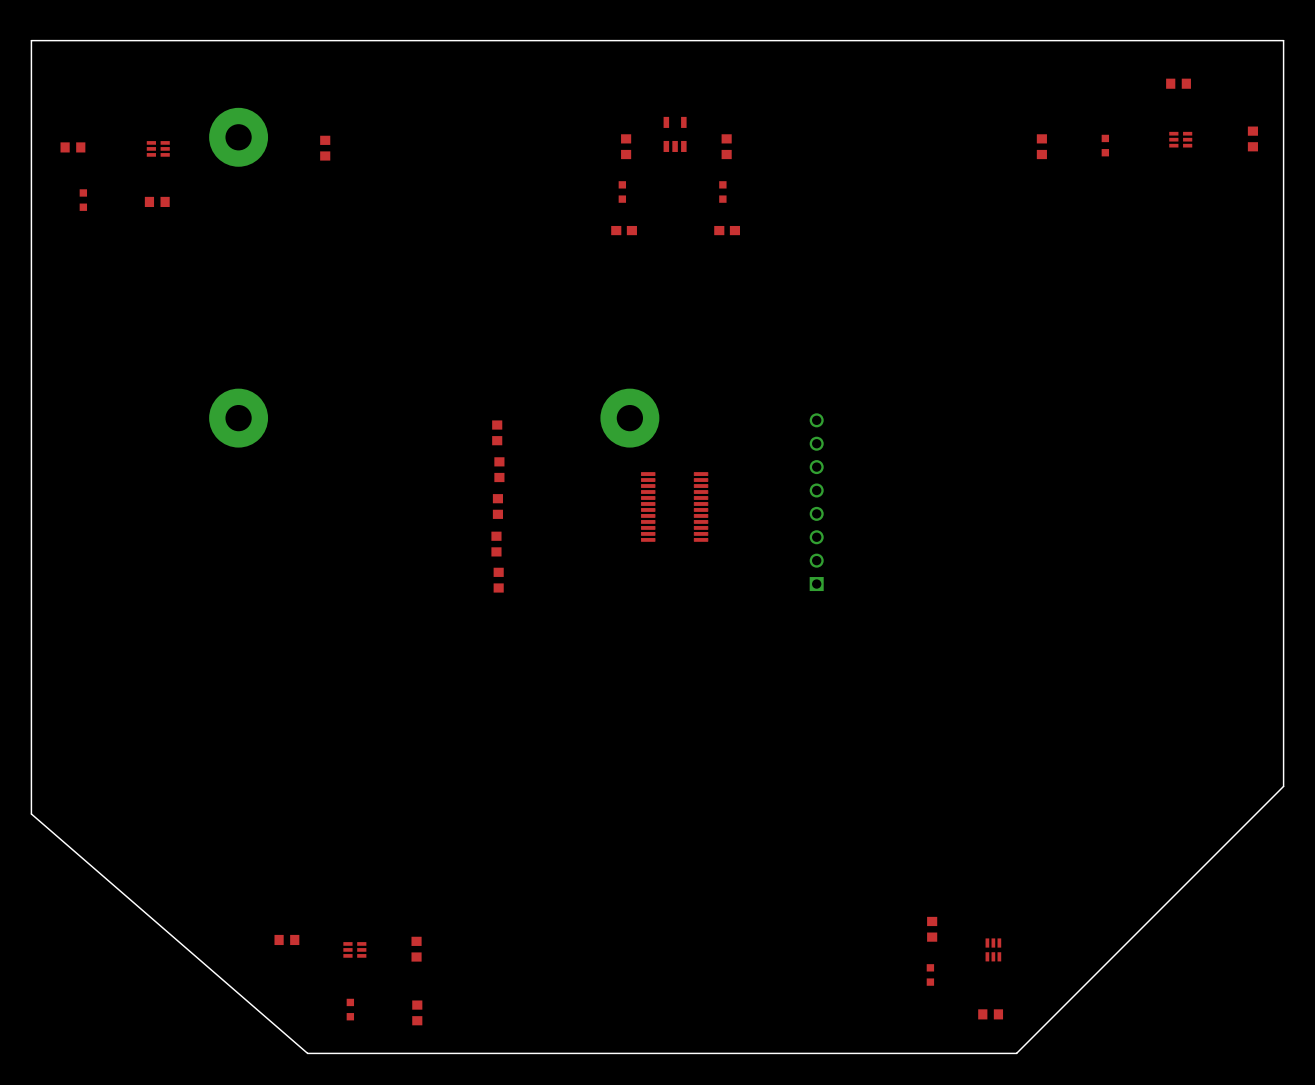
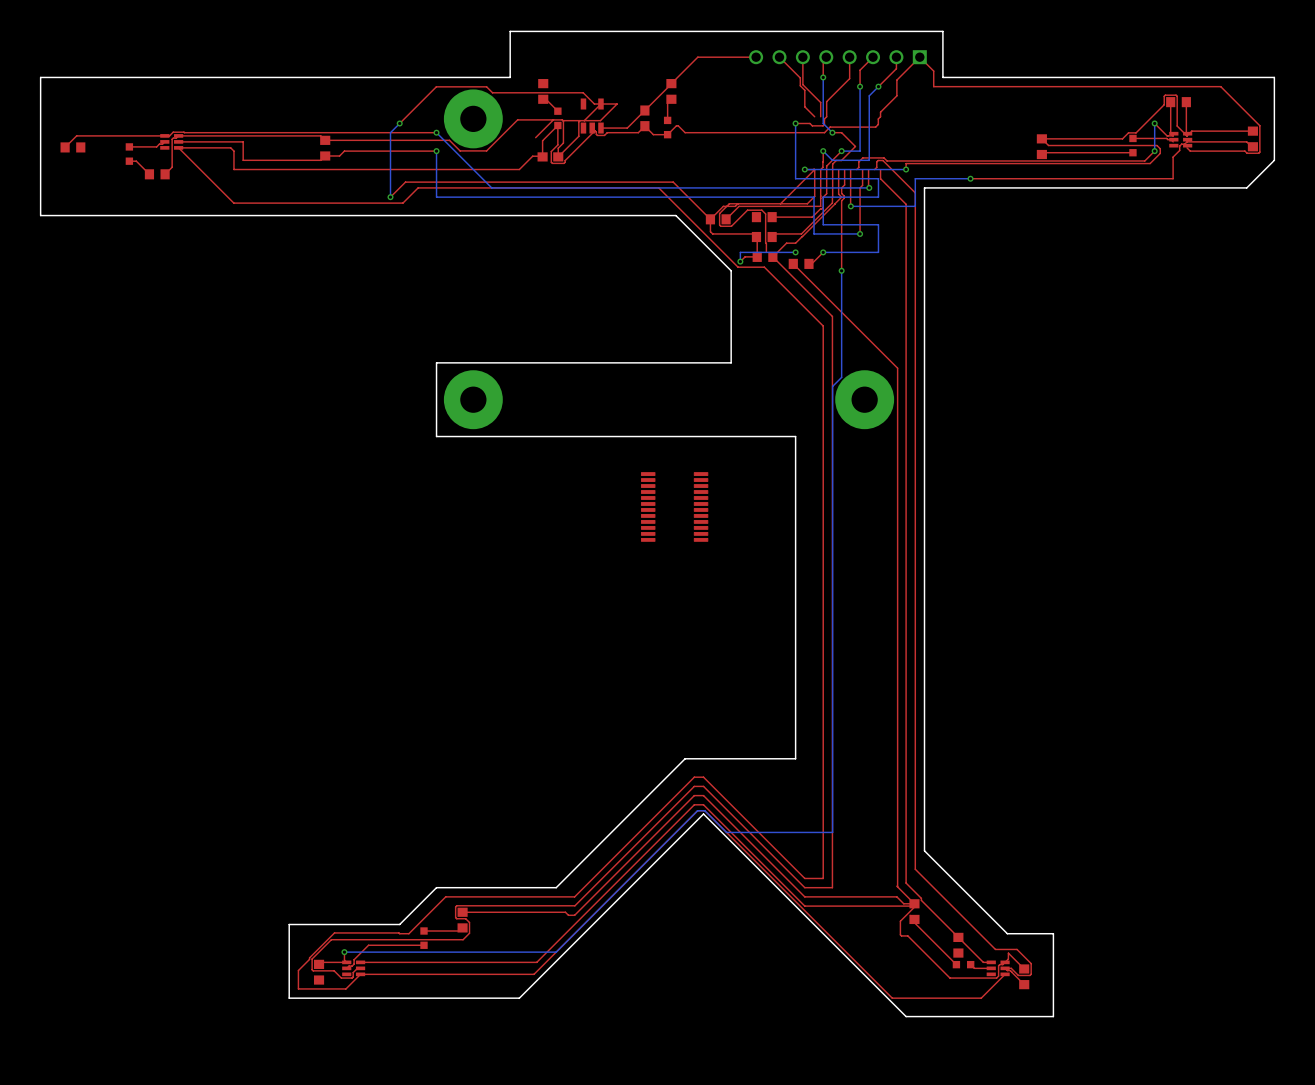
board edge: (1283, 40) (1283, 786) (1016, 1053) (307, 1053) (31, 814) (31, 40) (1283, 40) -> (942, 31) (942, 77) (1274, 77) (1274, 160) (1246, 187) (924, 187) (924, 850) (1007, 933) (1053, 933) (1053, 1016) (906, 1016) (703, 814) (519, 998) (289, 998) (289, 924) (399, 924) (436, 887) (556, 887) (685, 758) (795, 758) (795, 436) (436, 436) (436, 362) (731, 362) (731, 270) (675, 215) (40, 215) (40, 77) (510, 77) (510, 31) (942, 31)
top track: none -> (756, 57) (697, 57) (671, 83)
top track: none -> (779, 57) (800, 78) (800, 85) (804, 90) (804, 106) (814, 116)
top track: none -> (802, 57) (802, 84) (820, 102) (820, 116)
top track: none -> (826, 57) (823, 60) (823, 77)
part: none -> (837, 57)
top track: none -> (849, 57) (849, 78) (826, 101) (824, 124) (812, 125) (809, 123) (795, 123)
top track: none -> (873, 57) (860, 70) (860, 86)
top track: none -> (896, 57) (896, 68) (878, 86)
bottom track: none -> (823, 77) (823, 123) (832, 132)
via: none -> (823, 77)
top track: none -> (672, 82) (627, 128) (600, 128)
part position: (1178, 83) -> (1178, 102)
bottom track: none -> (860, 86) (860, 151) (841, 151)
via: none -> (860, 86)
bottom track: none -> (878, 86) (869, 95) (869, 160) (832, 160) (823, 151)
via: none -> (878, 86)
part: none -> (543, 91)
part: none -> (671, 91)
top track: none -> (543, 99) (545, 99) (557, 111)
top track: none -> (671, 99) (667, 103) (667, 120)
top track: none -> (1170, 102) (1170, 133) (1173, 135) (1167, 135) (1154, 123)
top track: none -> (1186, 102) (1186, 135)
top track: none -> (600, 104) (584, 120)
via: none -> (473, 118)
part: none -> (557, 118)
part: none -> (644, 118)
top track: none -> (553, 119) (535, 137)
top track: none -> (563, 120) (600, 120) (617, 104) (594, 104) (583, 92) (492, 92) (486, 86) (436, 86) (399, 123)
top track: none -> (579, 120) (578, 136) (558, 156) (558, 148) (563, 143) (562, 119) (517, 119) (486, 150) (460, 150) (449, 140) (325, 140) (320, 135) (178, 135) (172, 139) (172, 167) (165, 174)
bottom track: none -> (399, 123) (390, 132) (390, 197)
via: none -> (399, 123)
bottom track: none -> (795, 123) (795, 178) (878, 178) (878, 197) (823, 197) (823, 224) (878, 224) (878, 252) (823, 252)
via: none -> (795, 123)
bottom track: none -> (1154, 123) (1154, 151)
via: none -> (1154, 123)
part: none -> (667, 127)
top track: none -> (592, 128) (597, 135) (604, 135) (607, 132) (638, 132) (644, 126) (653, 134) (667, 134) (676, 125) (685, 132) (824, 132) (830, 127) (875, 127) (878, 124) (880, 112) (896, 95) (896, 80) (919, 57) (933, 71) (933, 86) (1220, 86) (1259, 125) (1258, 153) (1247, 153) (1244, 151) (1190, 151) (1187, 147)
top track: none -> (594, 130) (564, 163) (552, 163) (551, 151) (557, 144) (557, 125) (542, 140) (542, 156) (539, 153)
top track: none -> (1252, 131) (1191, 131) (1187, 135) (1177, 126) (1177, 96) (1165, 95) (1164, 104) (1136, 132) (1128, 132) (1122, 138) (1041, 138) (1048, 145) (1157, 145) (1160, 148) (1160, 153) (1150, 163) (906, 163) (906, 169)
top track: none -> (436, 132) (173, 132) (169, 135) (76, 135) (65, 147)
bottom track: none -> (436, 132) (491, 187) (869, 187)
via: none -> (436, 132)
top track: none -> (832, 132) (841, 132) (855, 146) (841, 160) (836, 160) (832, 164) (832, 202) (801, 233) (769, 233) (772, 237)
via: none -> (832, 132)
part position: (675, 134) -> (592, 116)
via: (238, 137) -> none
top track: none -> (1132, 138) (1166, 138) (1173, 141)
top track: none -> (164, 141) (156, 146) (129, 146)
top track: none -> (178, 141) (243, 141) (243, 160) (320, 160) (325, 155) (339, 155) (344, 151) (436, 151)
part position: (1105, 145) -> (1132, 145)
part: (626, 146) -> none
part: (726, 146) -> none
top track: none -> (1252, 146) (1246, 141) (1187, 141) (1179, 146) (1179, 150) (1173, 157) (1173, 178) (970, 178)
part position: (158, 148) -> (171, 141)
bottom track: none -> (436, 151) (436, 197) (814, 197) (814, 233) (860, 233)
via: none -> (436, 151)
top track: none -> (823, 151) (822, 167) (820, 169) (820, 206) (739, 206) (726, 219)
via: none -> (823, 151)
top track: none -> (841, 151) (826, 166) (826, 193) (823, 197) (821, 208) (812, 217) (772, 217)
via: none -> (841, 151)
top track: none -> (1154, 151) (1144, 160) (887, 160) (883, 157) (862, 157) (858, 161) (858, 167) (856, 169)
via: none -> (1154, 151)
top track: none -> (1132, 152) (1043, 152) (1041, 154)
top track: none -> (541, 156) (532, 156) (519, 169) (233, 169) (233, 151) (230, 147) (178, 147) (233, 203) (402, 203) (418, 187) (658, 187) (738, 267) (764, 267) (823, 326) (823, 878) (804, 878) (703, 777) (694, 777) (574, 896) (445, 896) (408, 933) (334, 932) (298, 970) (298, 988) (345, 988) (360, 974) (534, 974) (697, 810) (704, 810) (892, 998) (981, 998) (1005, 974)
part: none -> (550, 156)
top track: none -> (129, 161) (136, 161) (149, 174)
top track: none -> (814, 168) (814, 169)
via: none -> (804, 169)
top track: none -> (814, 169) (814, 196) (807, 203) (729, 203) (719, 213) (719, 225) (731, 226) (747, 210) (761, 210) (765, 213) (766, 252)
top track: none -> (814, 169) (780, 203)
top track: none -> (838, 169) (838, 194) (841, 197) (795, 243) (786, 243) (772, 256) (832, 316) (832, 887) (804, 887) (703, 786) (694, 786) (574, 905) (456, 905) (455, 917) (465, 918) (469, 922) (469, 933) (463, 939) (331, 939) (312, 958) (313, 970) (334, 970) (341, 978) (352, 978) (353, 972) (357, 968) (360, 968)
top track: none -> (844, 169) (844, 184) (841, 187) (841, 193) (844, 196) (841, 200) (841, 270)
top track: none -> (850, 169) (850, 206)
top track: none -> (862, 169) (862, 185) (860, 187) (860, 233)
top track: none -> (868, 169) (869, 187)
top track: none -> (874, 169) (876, 167) (876, 161) (882, 160) (915, 192) (915, 869) (995, 949) (1017, 949) (1031, 963) (1030, 975) (1018, 975) (1011, 968) (1005, 968) (1010, 970) (1024, 984)
top track: none -> (880, 169) (880, 178) (906, 204) (906, 883) (983, 962) (991, 962)
bottom track: none -> (906, 169) (804, 169)
via: none -> (906, 169)
bottom track: none -> (970, 178) (915, 178) (915, 206) (850, 206)
via: none -> (970, 178)
via: none -> (869, 187)
part: (622, 191) -> none
part: (722, 191) -> none
top track: none -> (390, 197) (405, 182) (673, 182) (710, 219)
via: none -> (390, 197)
part position: (83, 200) -> (129, 154)
part position: (157, 201) -> (157, 174)
top track: none -> (738, 203) (735, 206) (723, 206) (710, 219)
via: none -> (850, 206)
part: none -> (764, 217)
top track: none -> (710, 219) (710, 231) (712, 233) (753, 233) (757, 237) (757, 256)
part: none -> (718, 219)
part: (624, 230) -> none
part: (727, 230) -> none
via: none -> (860, 233)
part: none -> (764, 237)
bottom track: none -> (795, 252) (740, 252) (740, 261)
via: none -> (795, 252)
top track: none -> (823, 252) (811, 263) (808, 263)
via: none -> (823, 252)
top track: none -> (760, 256) (745, 256) (740, 261)
part: none -> (765, 256)
via: none -> (740, 261)
top track: none -> (793, 263) (897, 368) (897, 886)
part: none -> (801, 263)
bottom track: none -> (841, 270) (841, 377) (832, 386) (832, 832) (726, 832) (704, 810) (697, 810) (556, 952) (344, 952)
via: none -> (841, 270)
via: none -> (473, 399)
via: none -> (864, 399)
via: (238, 418) -> none
via: (629, 418) -> none
part: (497, 432) -> none
part: (499, 469) -> none
part: (816, 502) -> none
part: (497, 506) -> none
part: (496, 544) -> none
part: (498, 580) -> none
top track: none -> (896, 886) (914, 903)
top track: none -> (914, 903) (914, 907) (900, 921) (900, 934) (907, 935) (949, 978) (996, 978) (998, 976) (998, 965) (1008, 959) (1008, 953) (1024, 968)
top track: none -> (914, 903) (912, 906) (804, 906) (703, 804) (694, 804) (536, 962) (360, 962)
top track: none -> (914, 903) (903, 903) (896, 896) (804, 896) (703, 795) (694, 795) (574, 915) (568, 915) (565, 912) (462, 912)
part: none -> (914, 911)
top track: none -> (910, 915) (914, 919) (914, 922) (956, 964)
part: none -> (462, 920)
part: (932, 929) -> none
top track: none -> (465, 931) (462, 927) (459, 931) (424, 931)
part rotation: 0° (286, 939) -> 90° clockwise (319, 972)
part position: (286, 939) -> (319, 972)
top track: none -> (424, 945) (368, 945) (354, 959) (354, 964) (346, 968)
part: none -> (958, 945)
part position: (354, 949) -> (353, 968)
part: (416, 949) -> none
part rotation: 0° (993, 949) -> 90° clockwise (998, 968)
part position: (993, 949) -> (998, 968)
top track: none -> (344, 952) (344, 960) (346, 962) (321, 962) (319, 964)
via: none -> (344, 952)
top track: none -> (970, 964) (974, 968) (991, 968)
part rotation: 0° (930, 974) -> 90° clockwise (963, 964)
part position: (930, 974) -> (963, 964)
part: none -> (1024, 976)
part position: (350, 1009) -> (424, 938)
part: (417, 1012) -> none
part: (990, 1014) -> none

